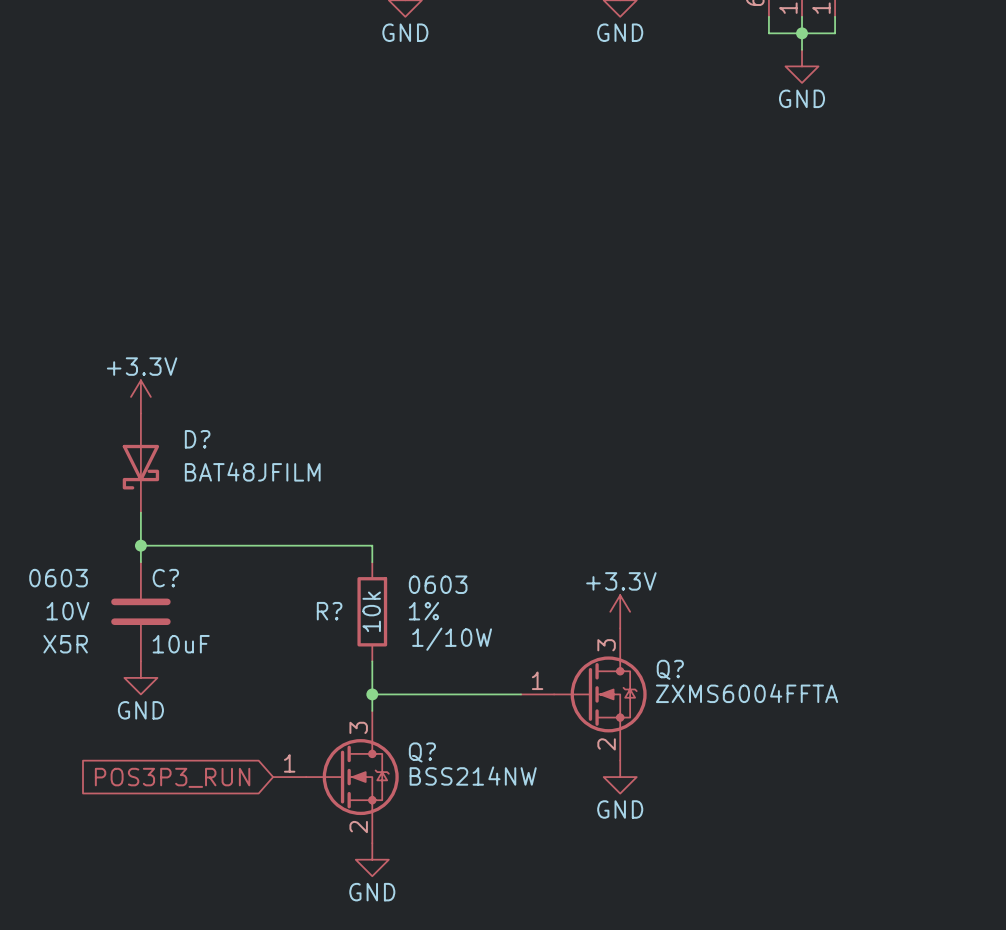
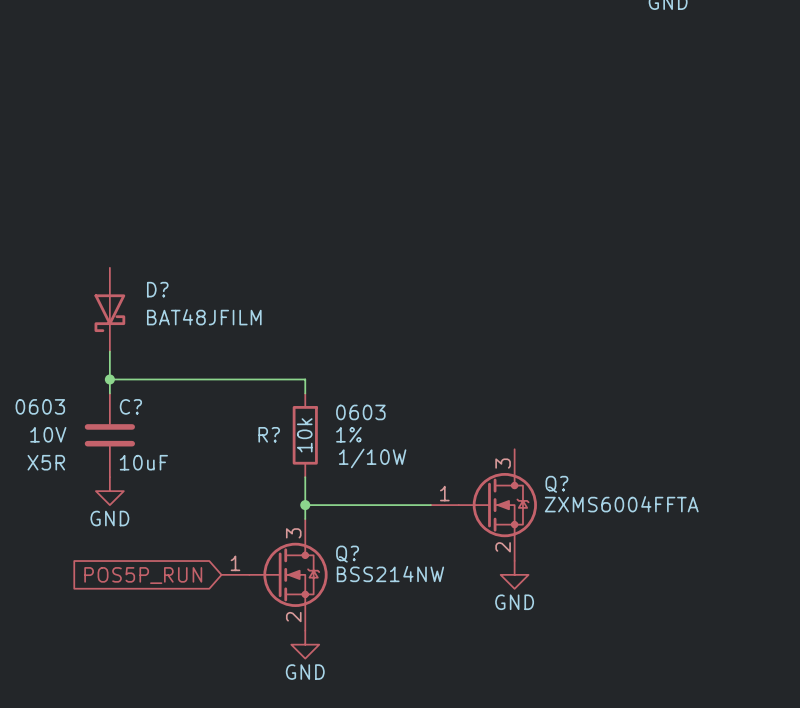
power symbol: +3.3V (140, 396) -> none
power symbol: +3.3V (620, 611) -> none
global label: POS3P3_RUN (172, 777) -> POS5P_RUN (143, 575)

